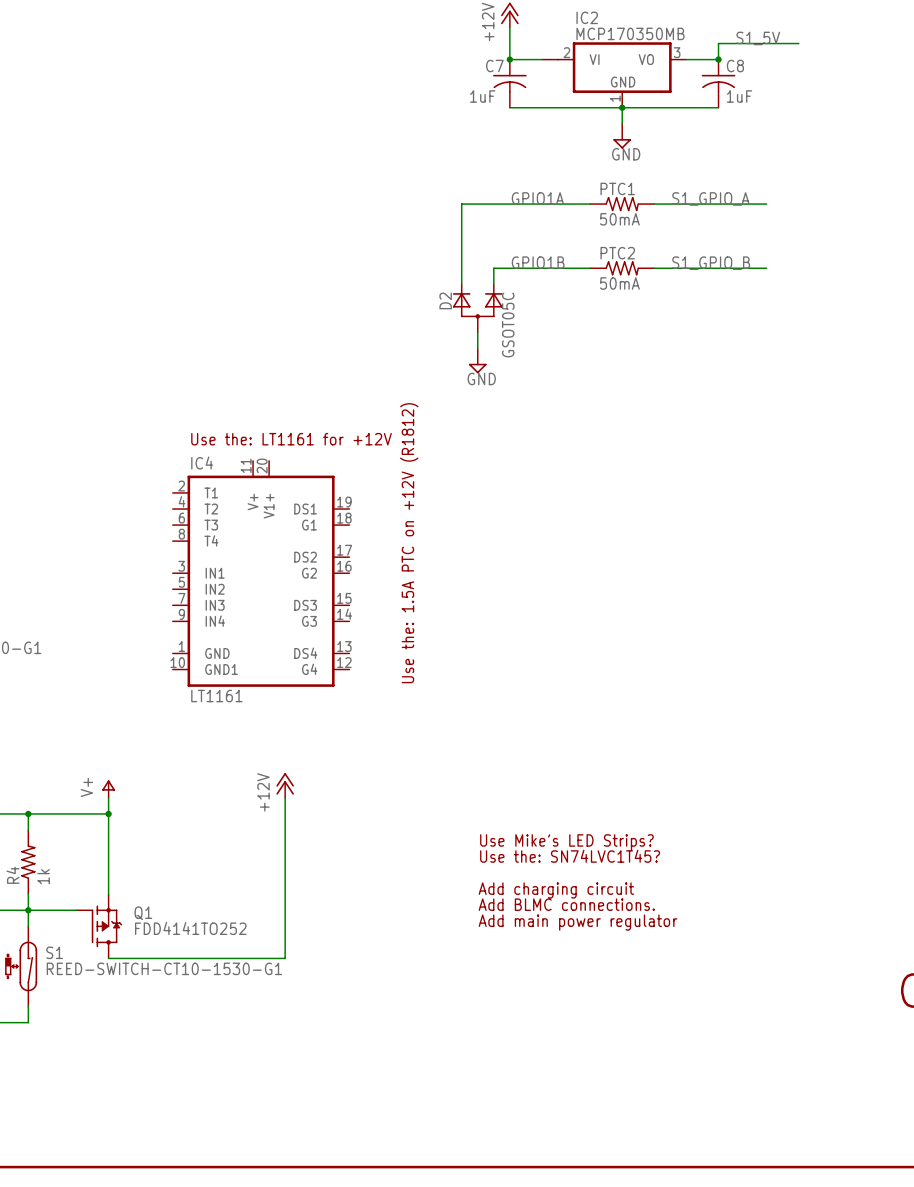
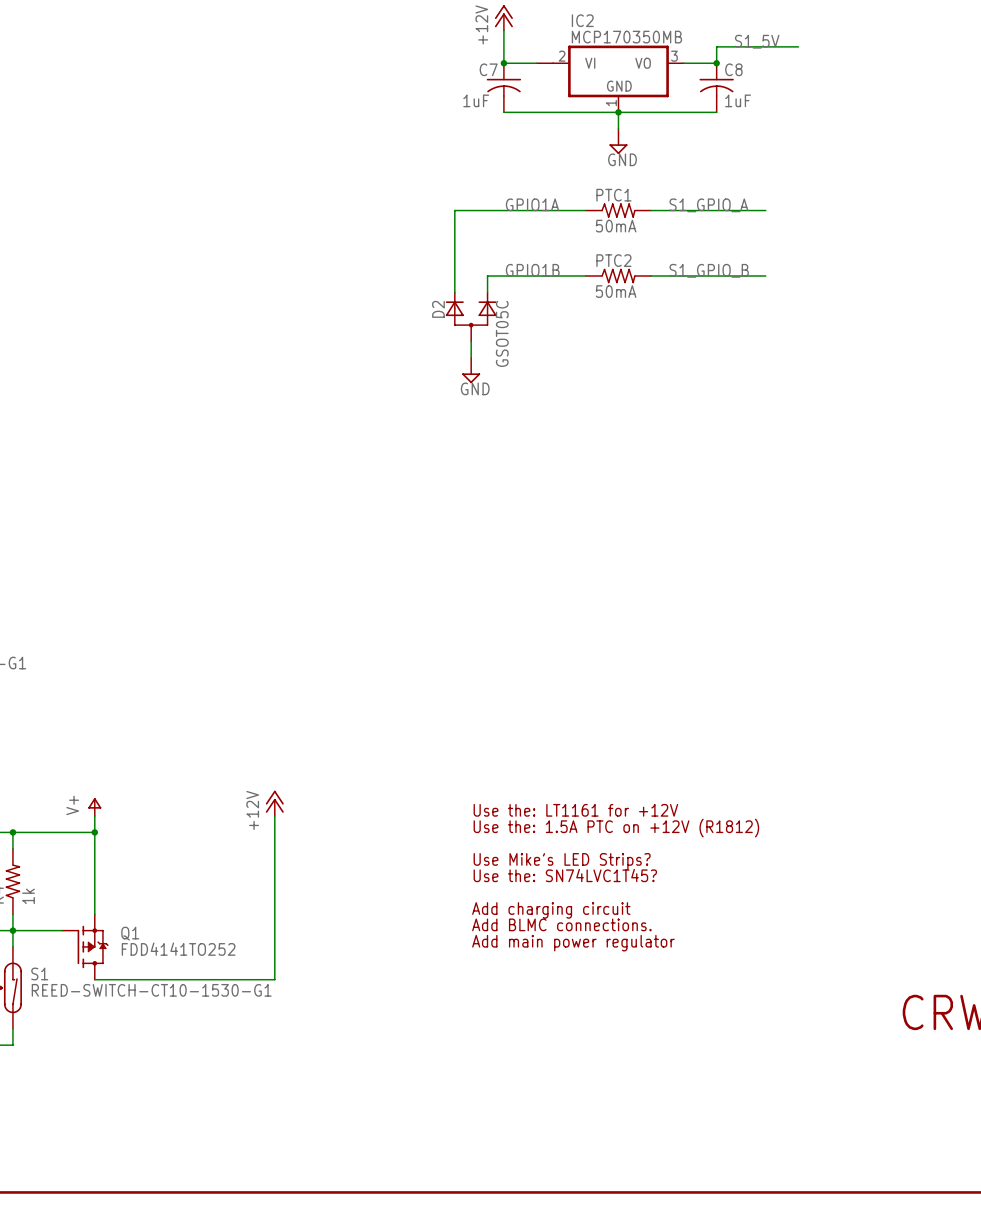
text: Use the: LT1161 for +12V (291, 439) -> none
text rotation: 0° (409, 543) -> 90° clockwise (616, 828)
text position: Use the: 1.5A PTC on +12V (R1812) (409, 543) -> Use the: 1.5A PTC on +12V (R1812) (616, 828)
IC4: LT1161 (261, 573) -> none
text: none -> Use the: LT1161 for +12V (575, 810)

